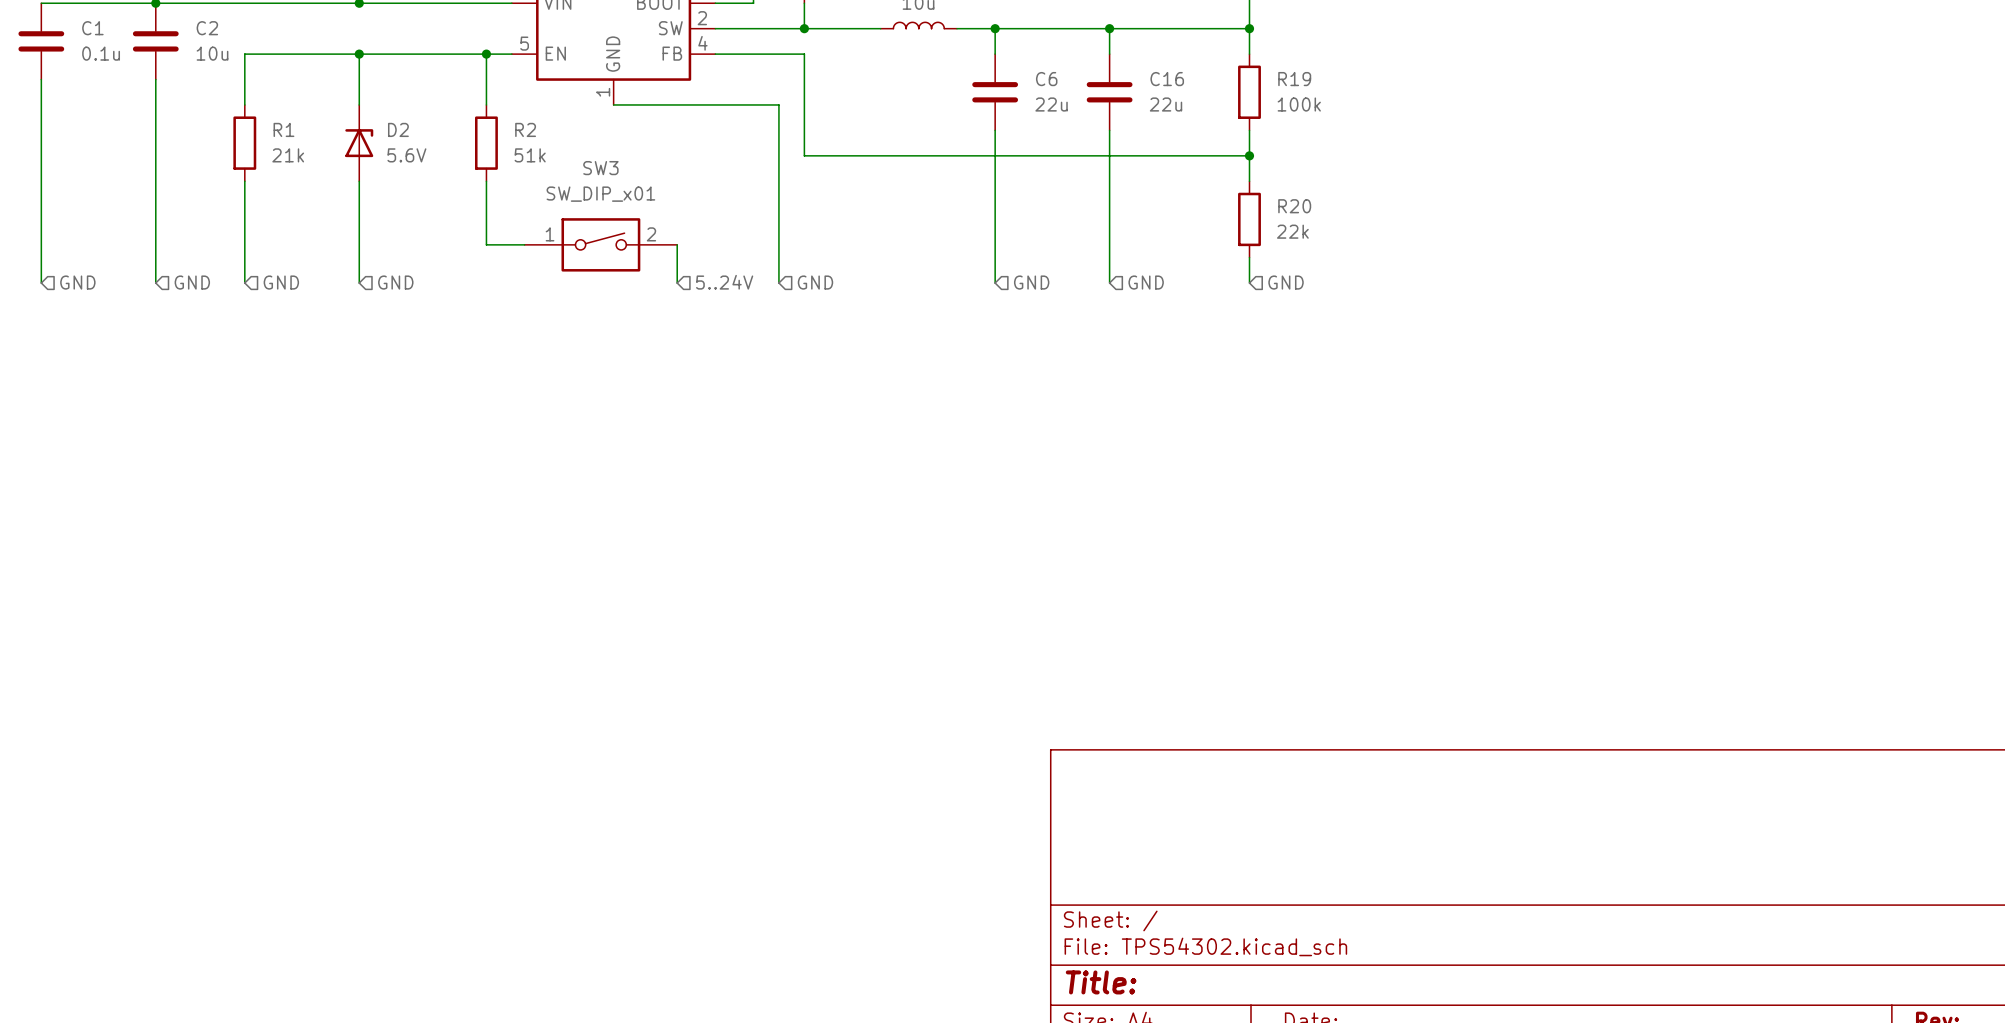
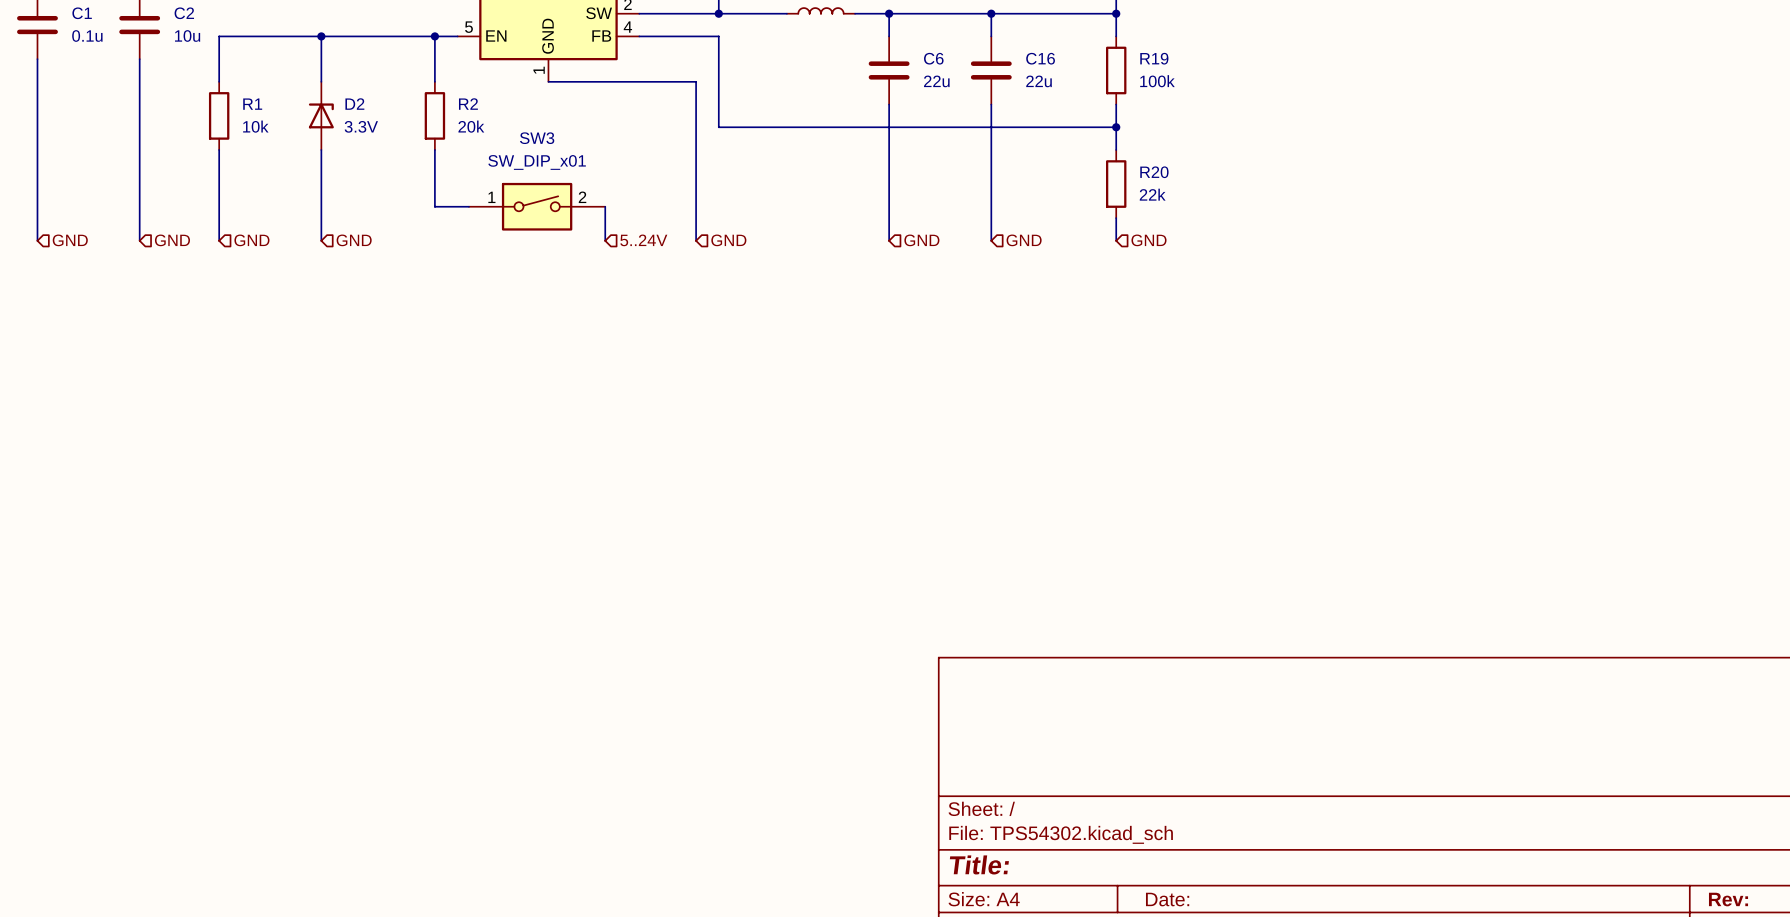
R1 value: 21k (288, 155) -> 10k (255, 126)
D2 value: 5.6V (406, 155) -> 3.3V (361, 126)
R2 value: 51k (530, 155) -> 20k (471, 126)

